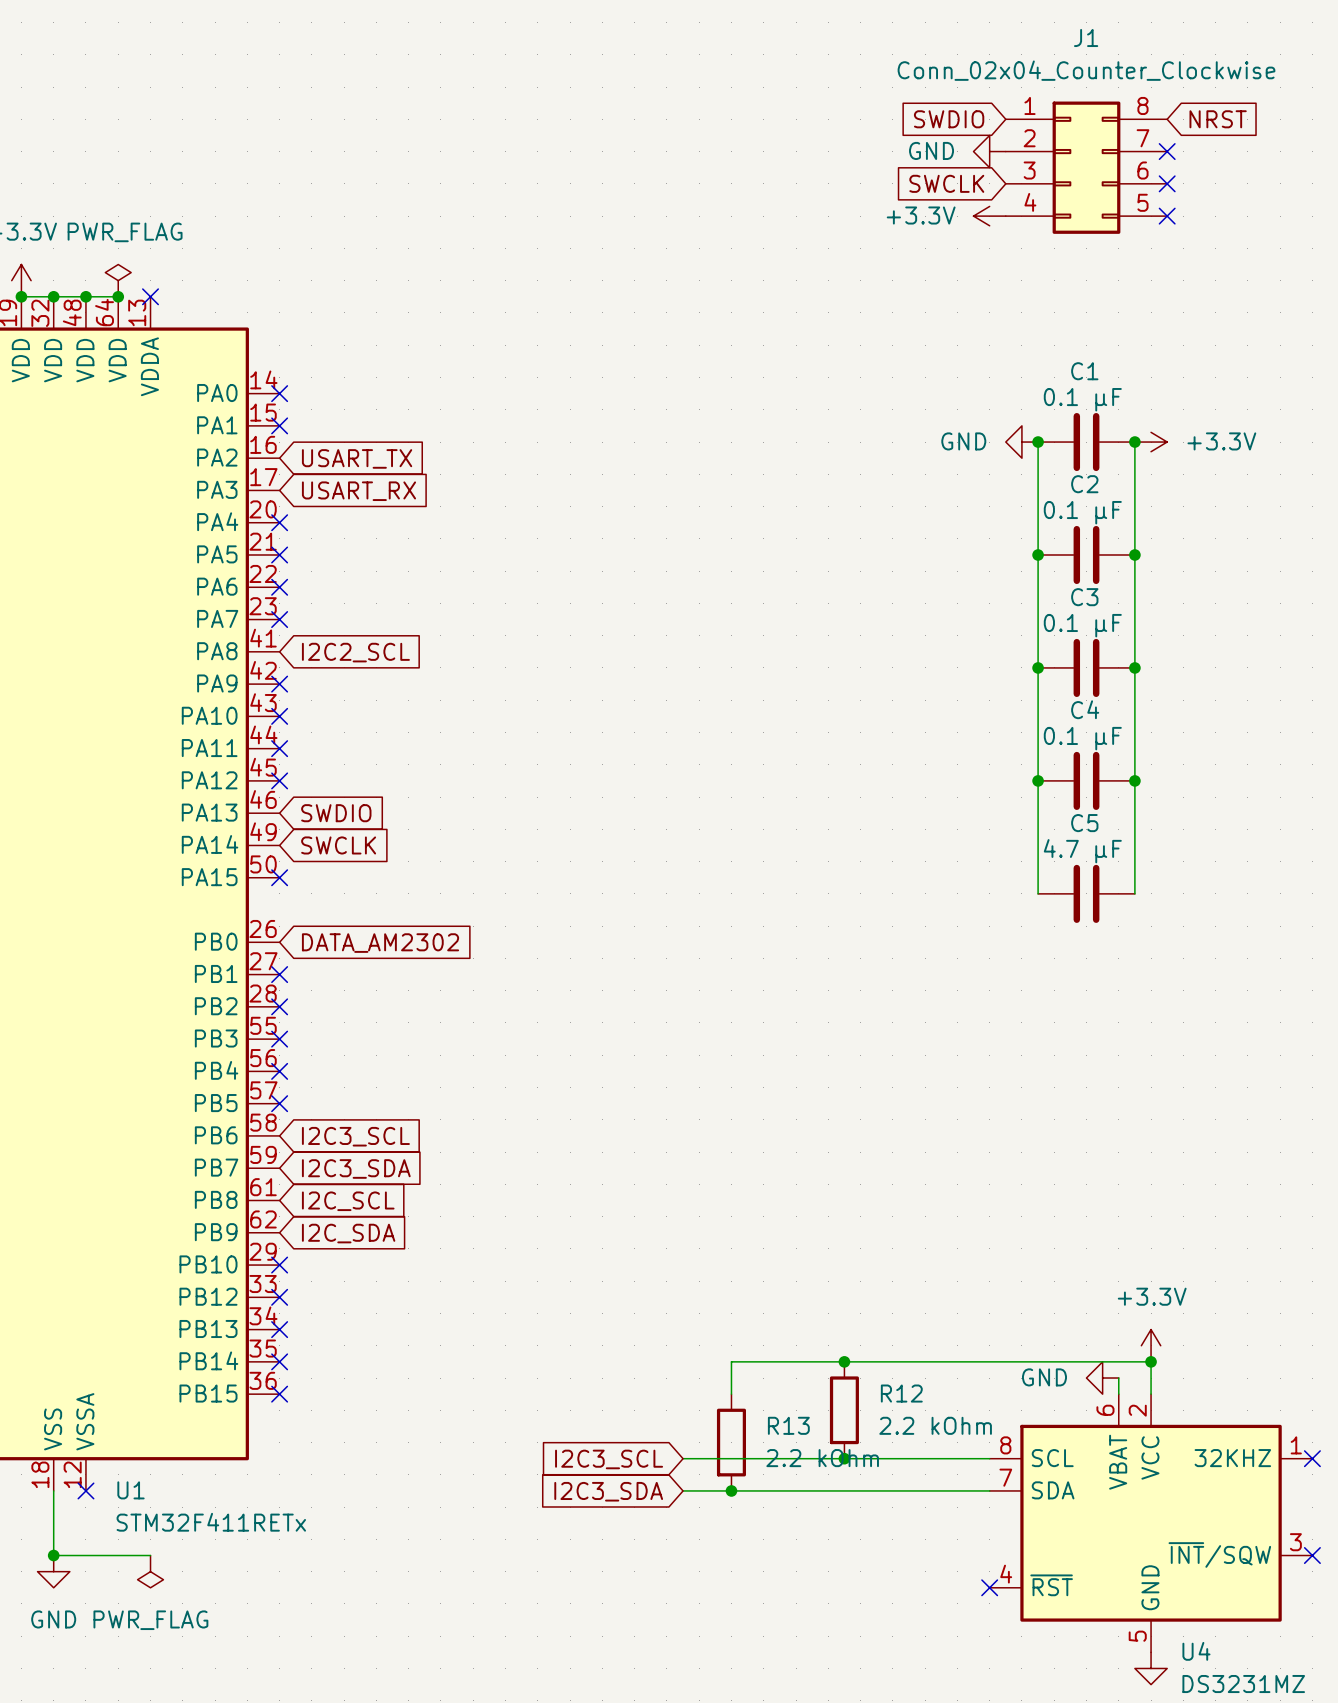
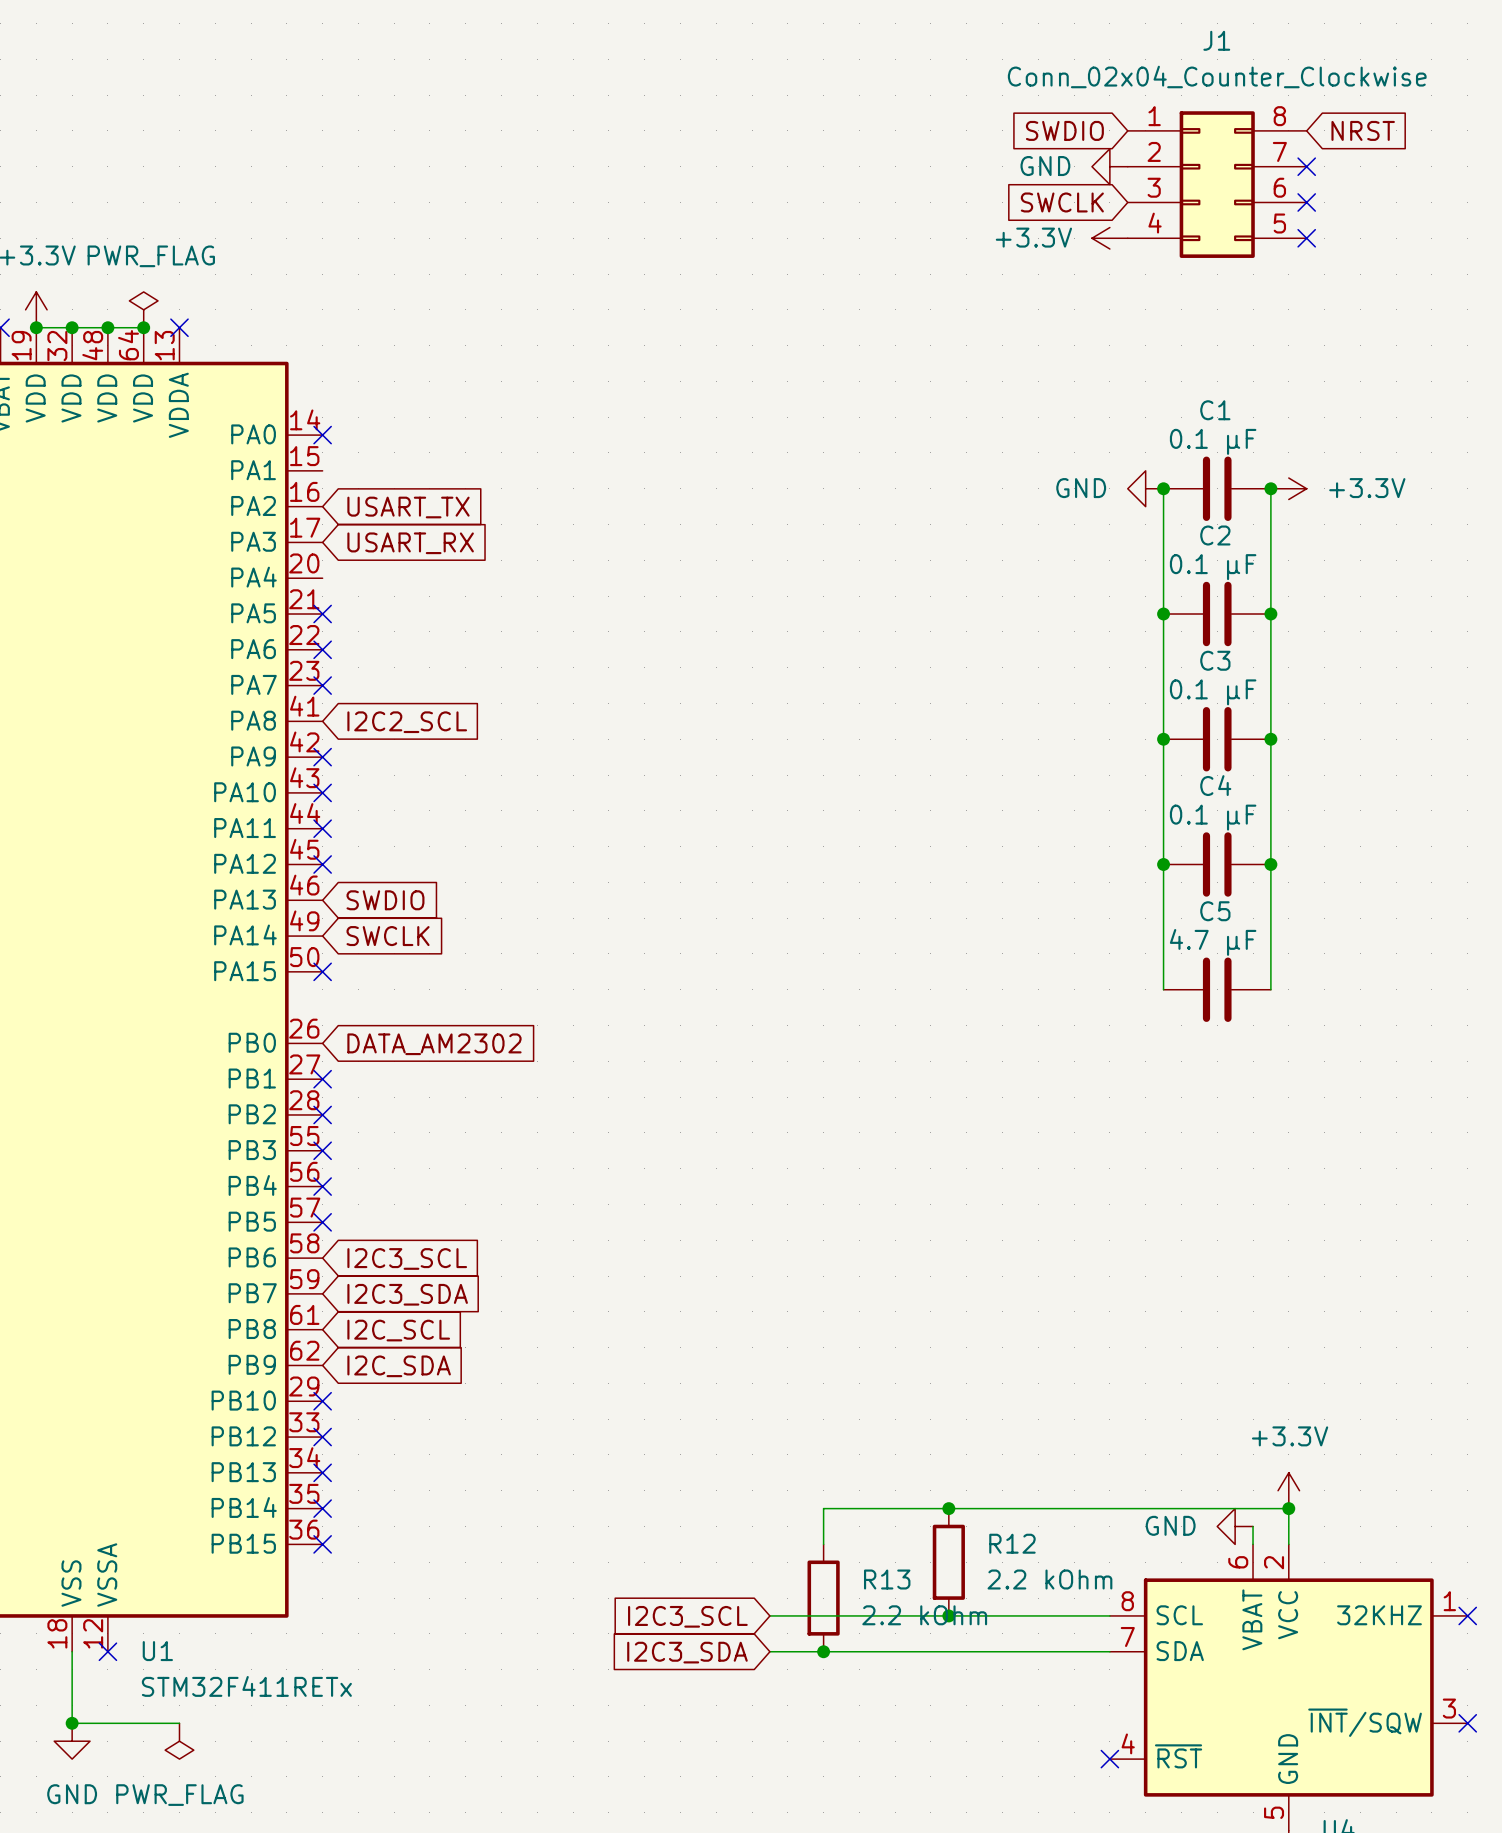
no-connect mark: (279, 425) -> none
no-connect mark: (279, 522) -> none

